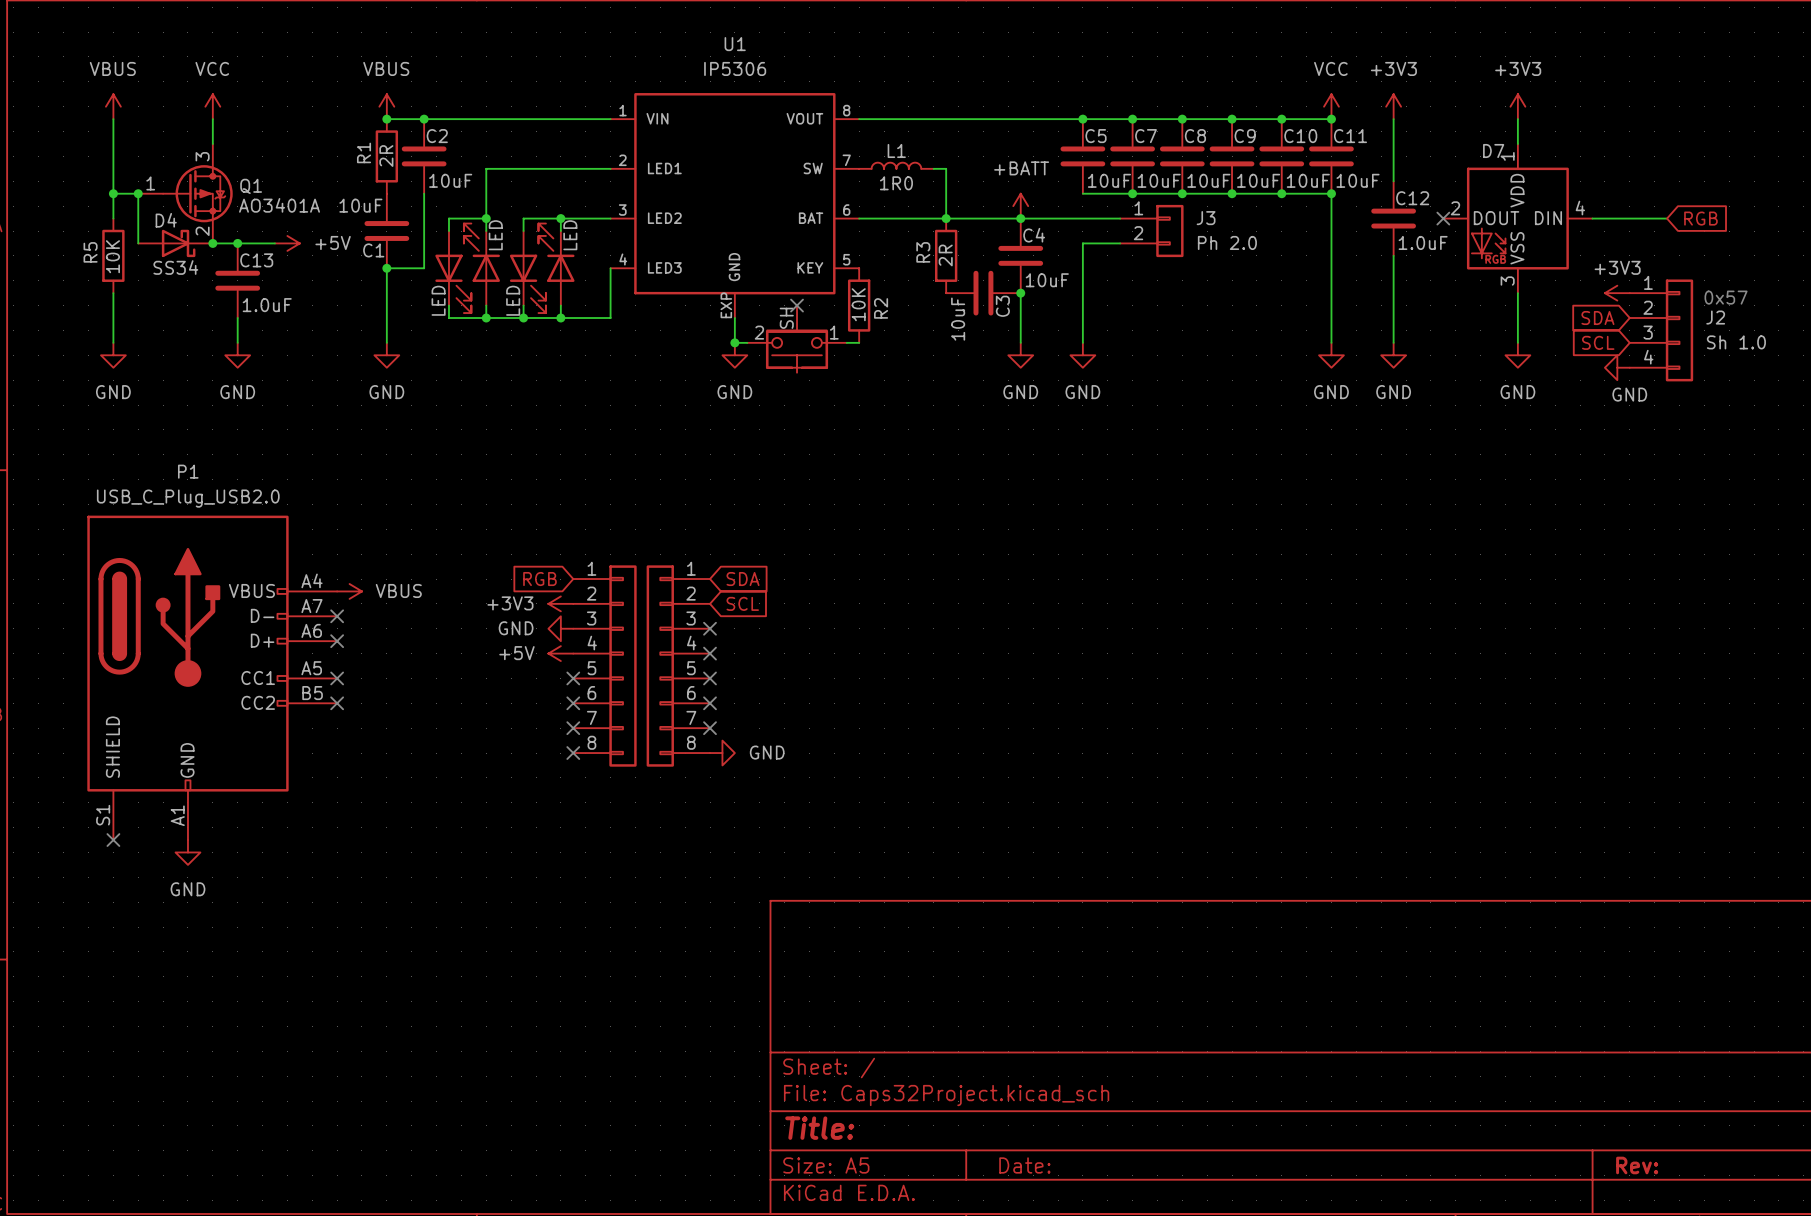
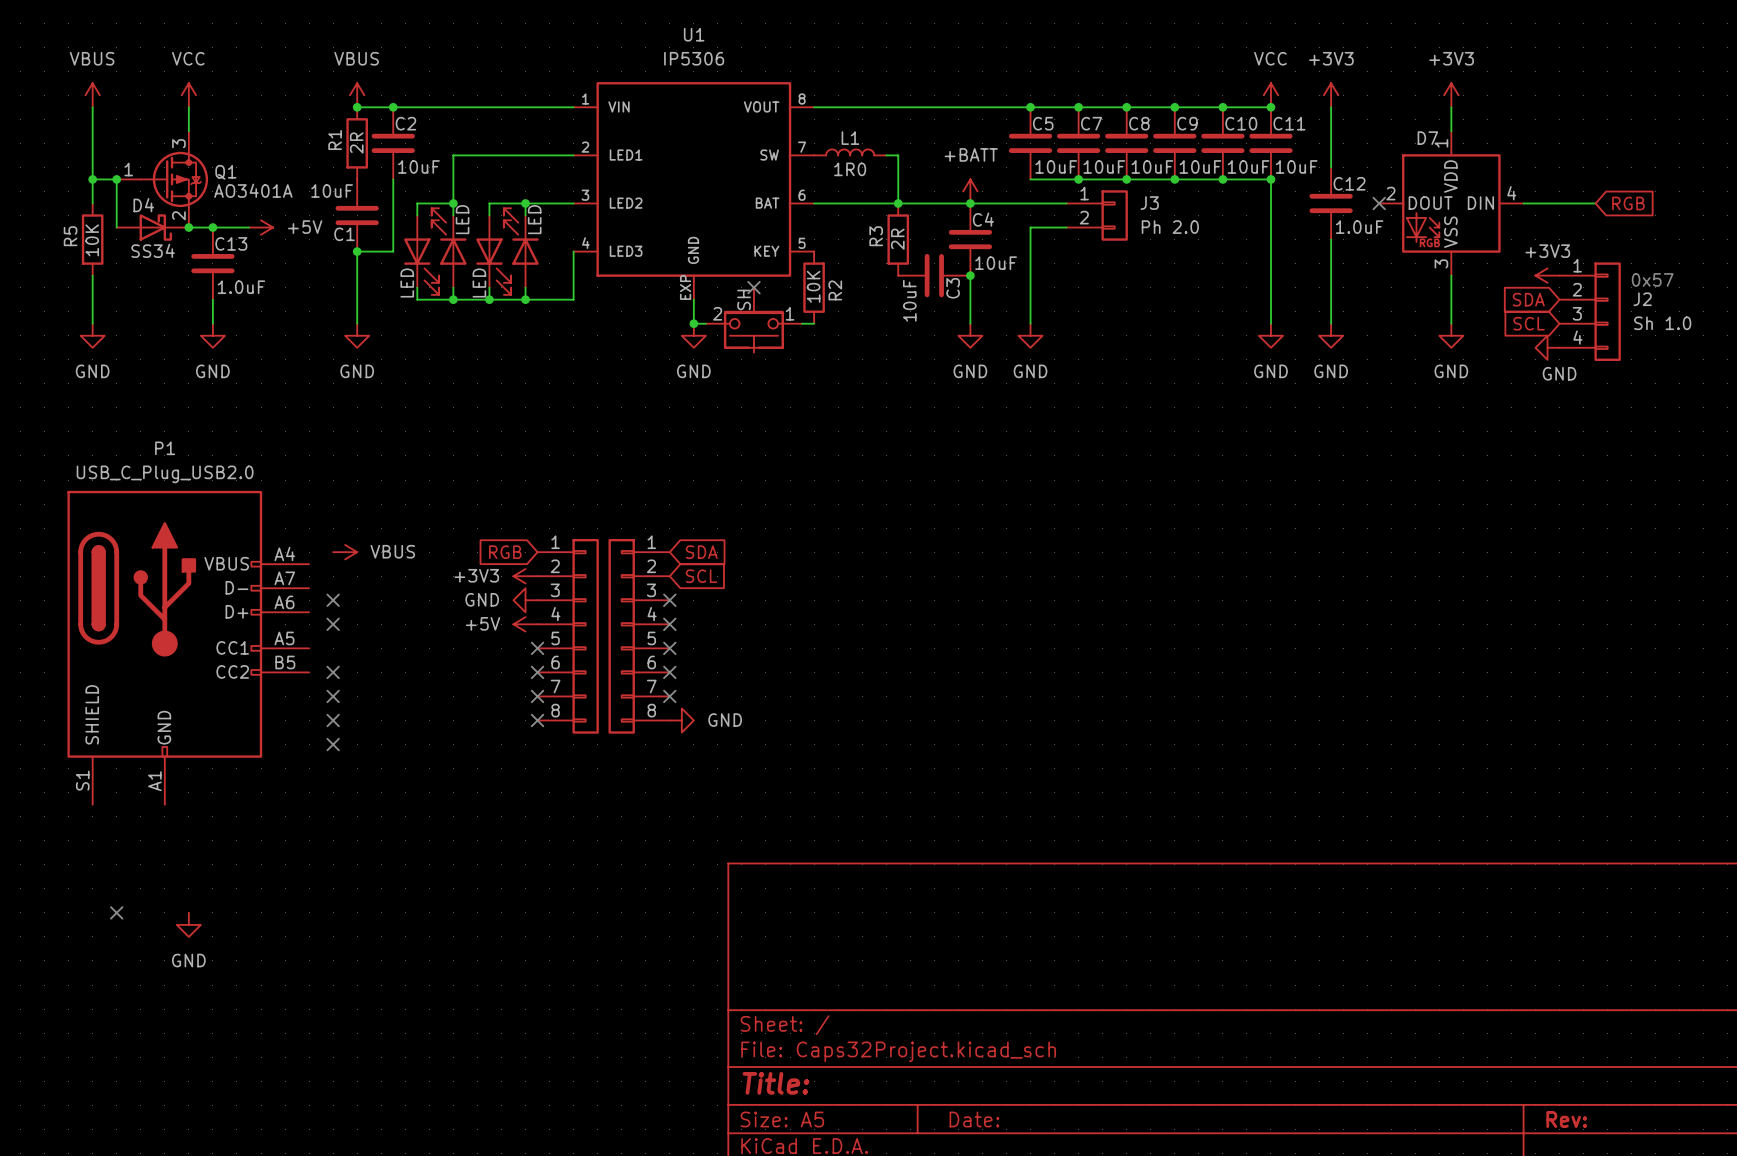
power symbol position: VBUS (349, 591) -> VBUS (345, 552)
no-connect mark: (337, 616) -> none
no-connect mark: none -> (333, 600)
no-connect mark: (337, 641) -> none
no-connect mark: none -> (333, 624)
no-connect mark: (337, 678) -> none
no-connect mark: (337, 703) -> none
no-connect mark: none -> (333, 672)
no-connect mark: none -> (333, 696)
no-connect mark: none -> (333, 720)
no-connect mark: none -> (333, 744)
no-connect mark: (113, 840) -> none
power symbol position: GND (187, 852) -> GND (188, 924)
no-connect mark: none -> (116, 912)

